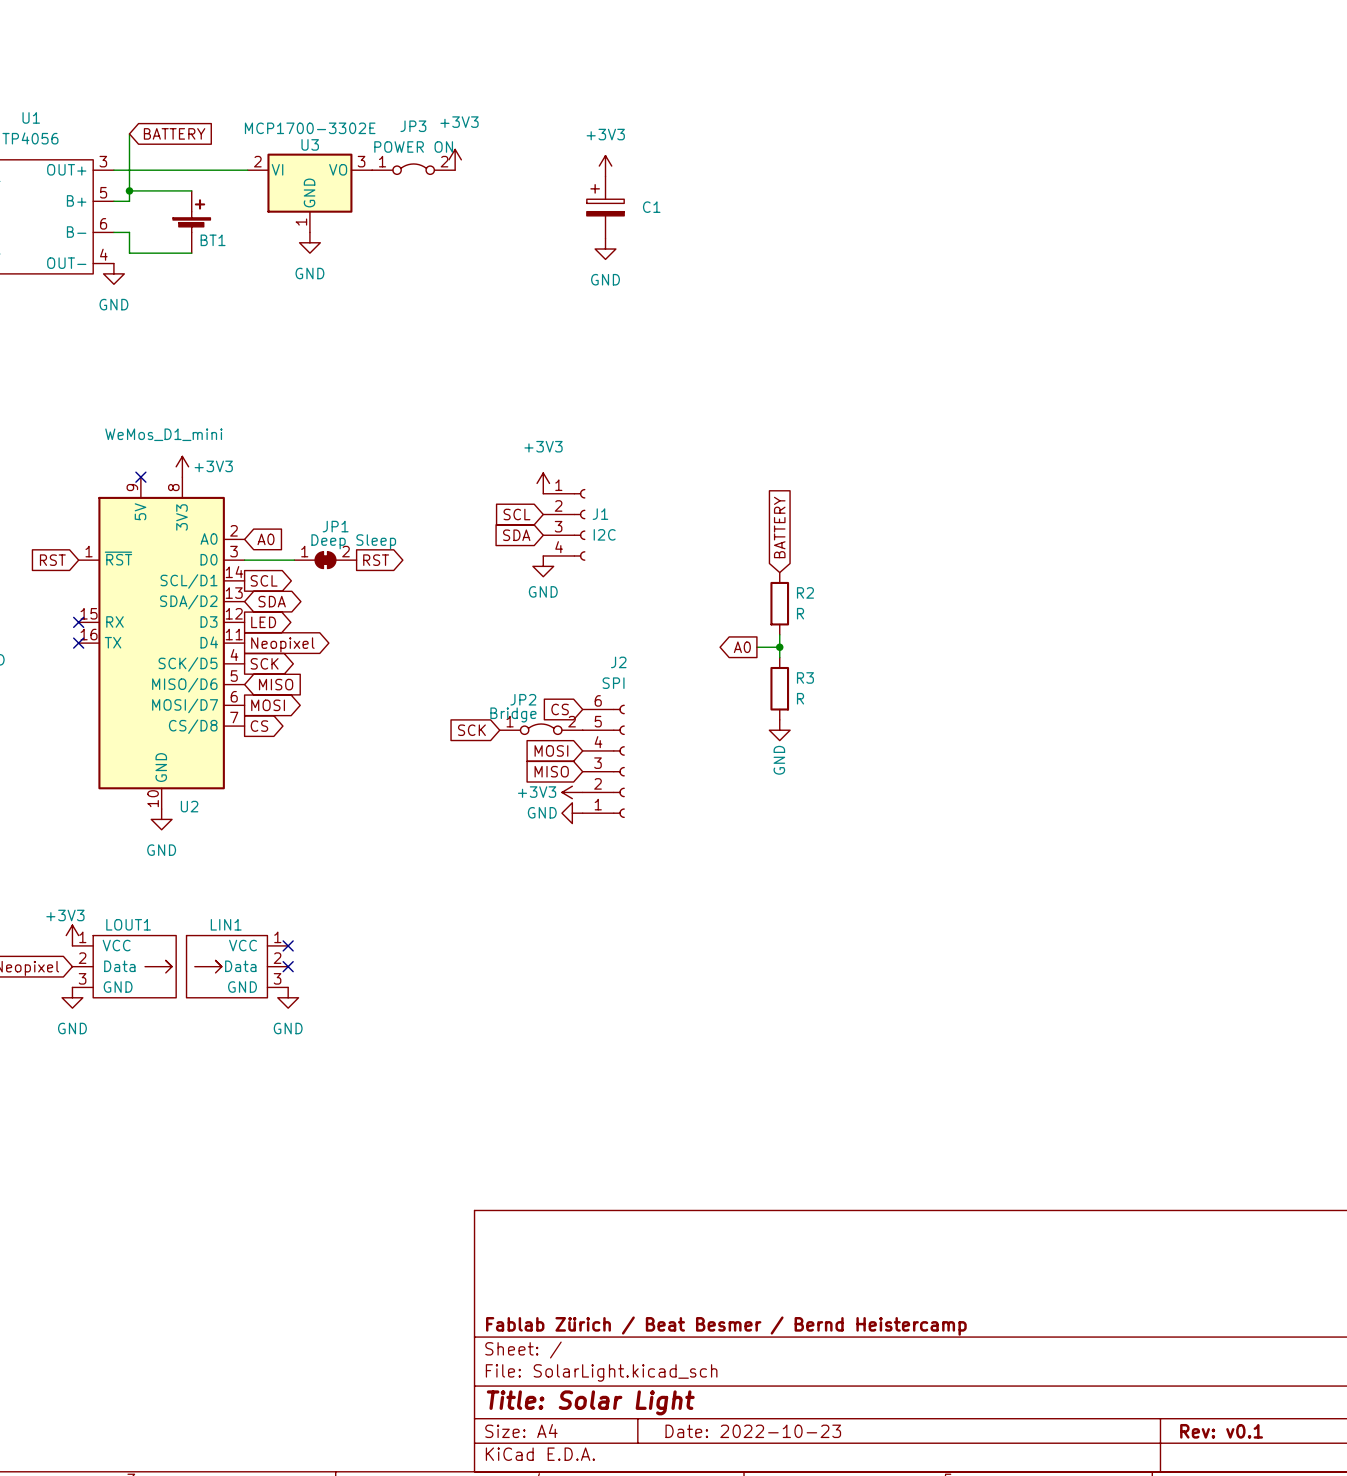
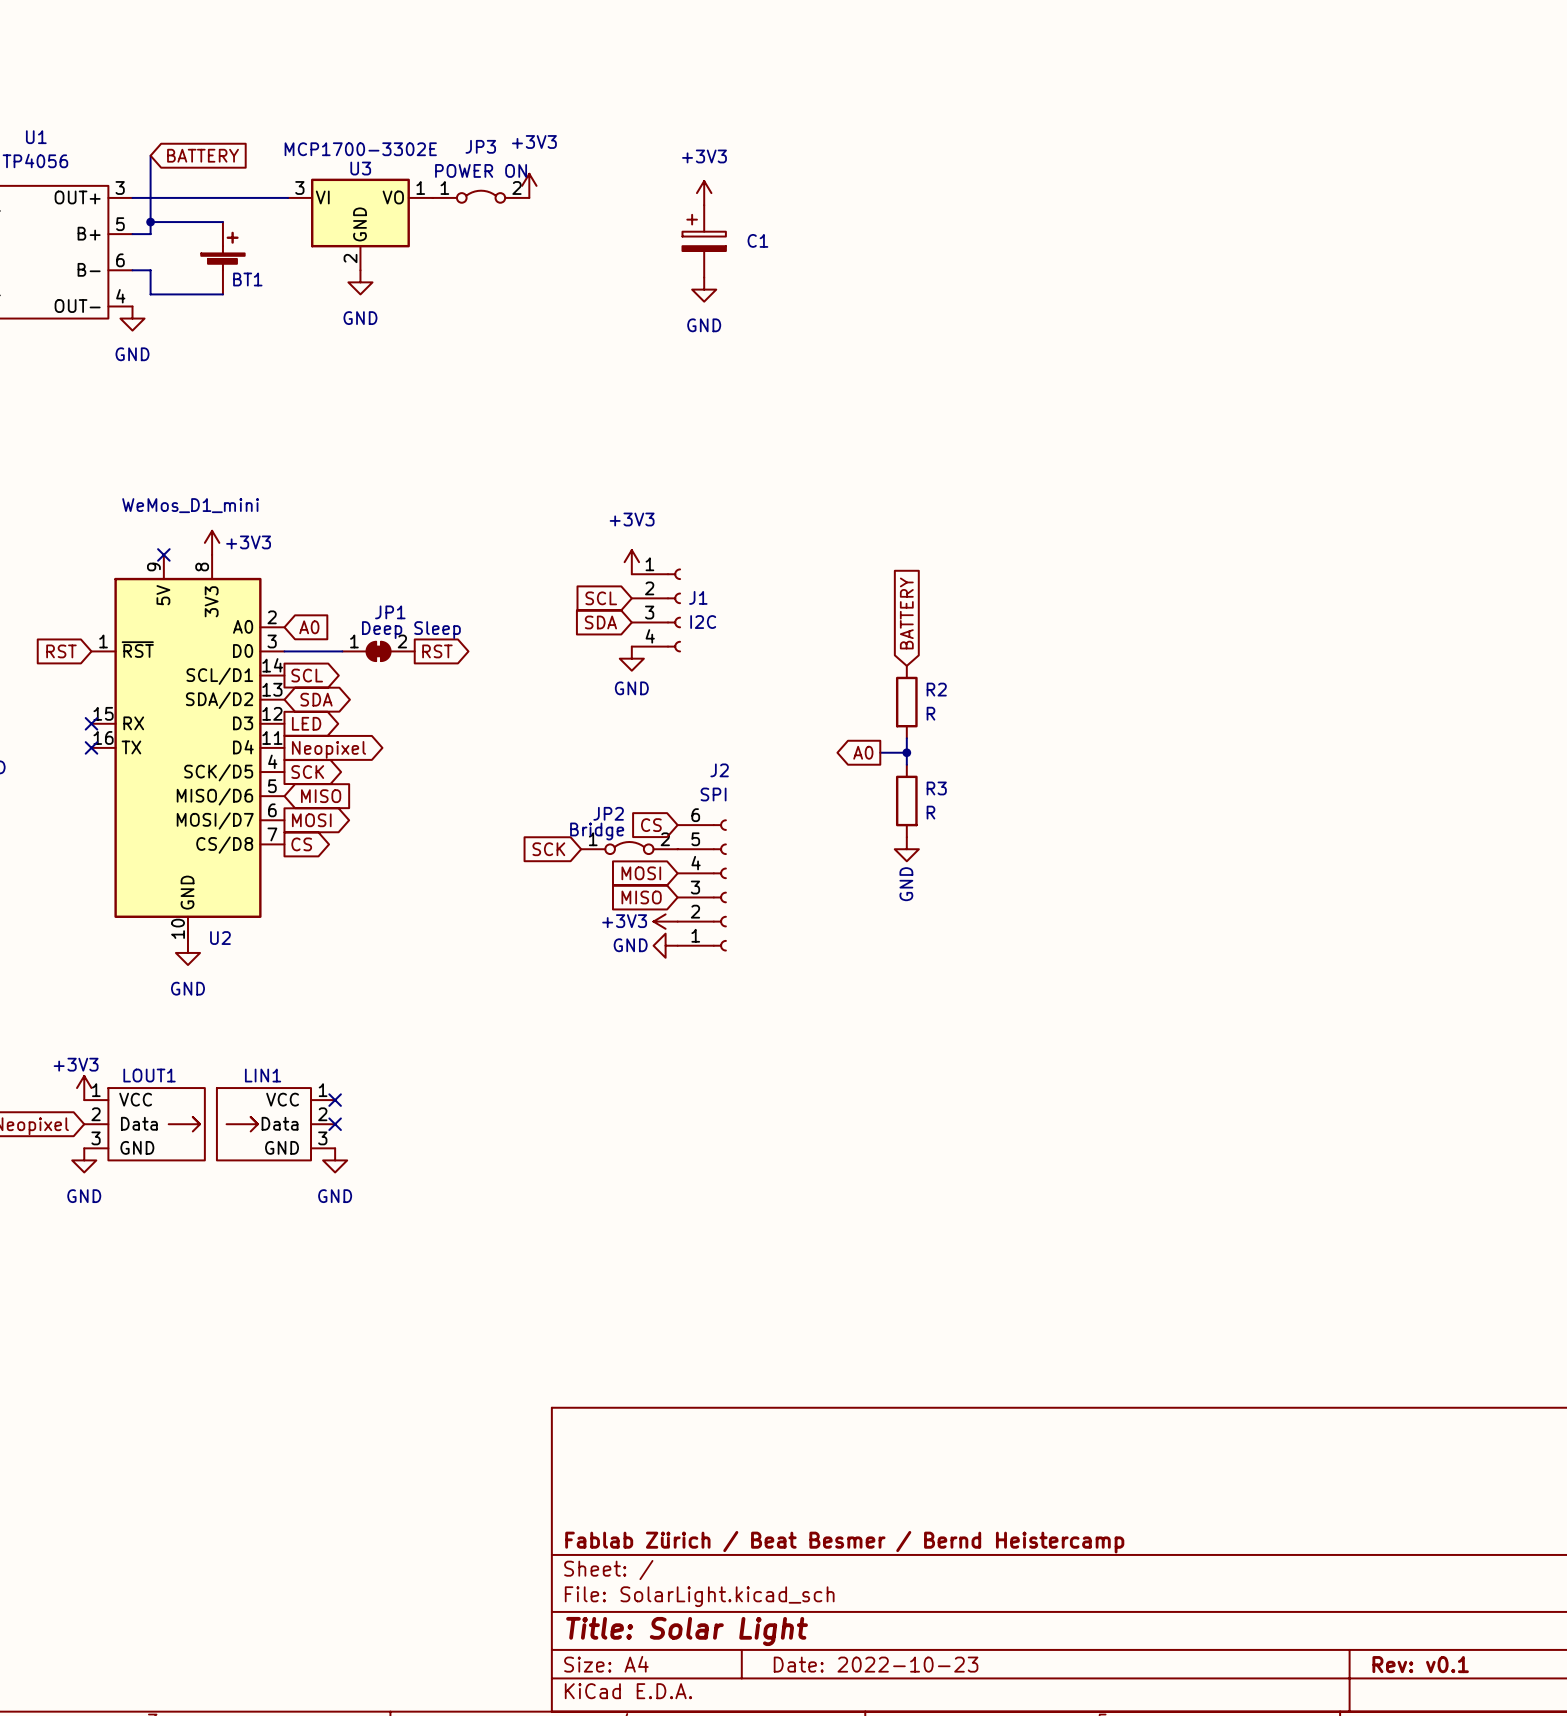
U3 pin number: 2 (257, 161) -> 3 (299, 187)
U3 pin number: 3 (361, 161) -> 1 (420, 187)
U3 pin number: 1 (301, 222) -> 2 (350, 258)

